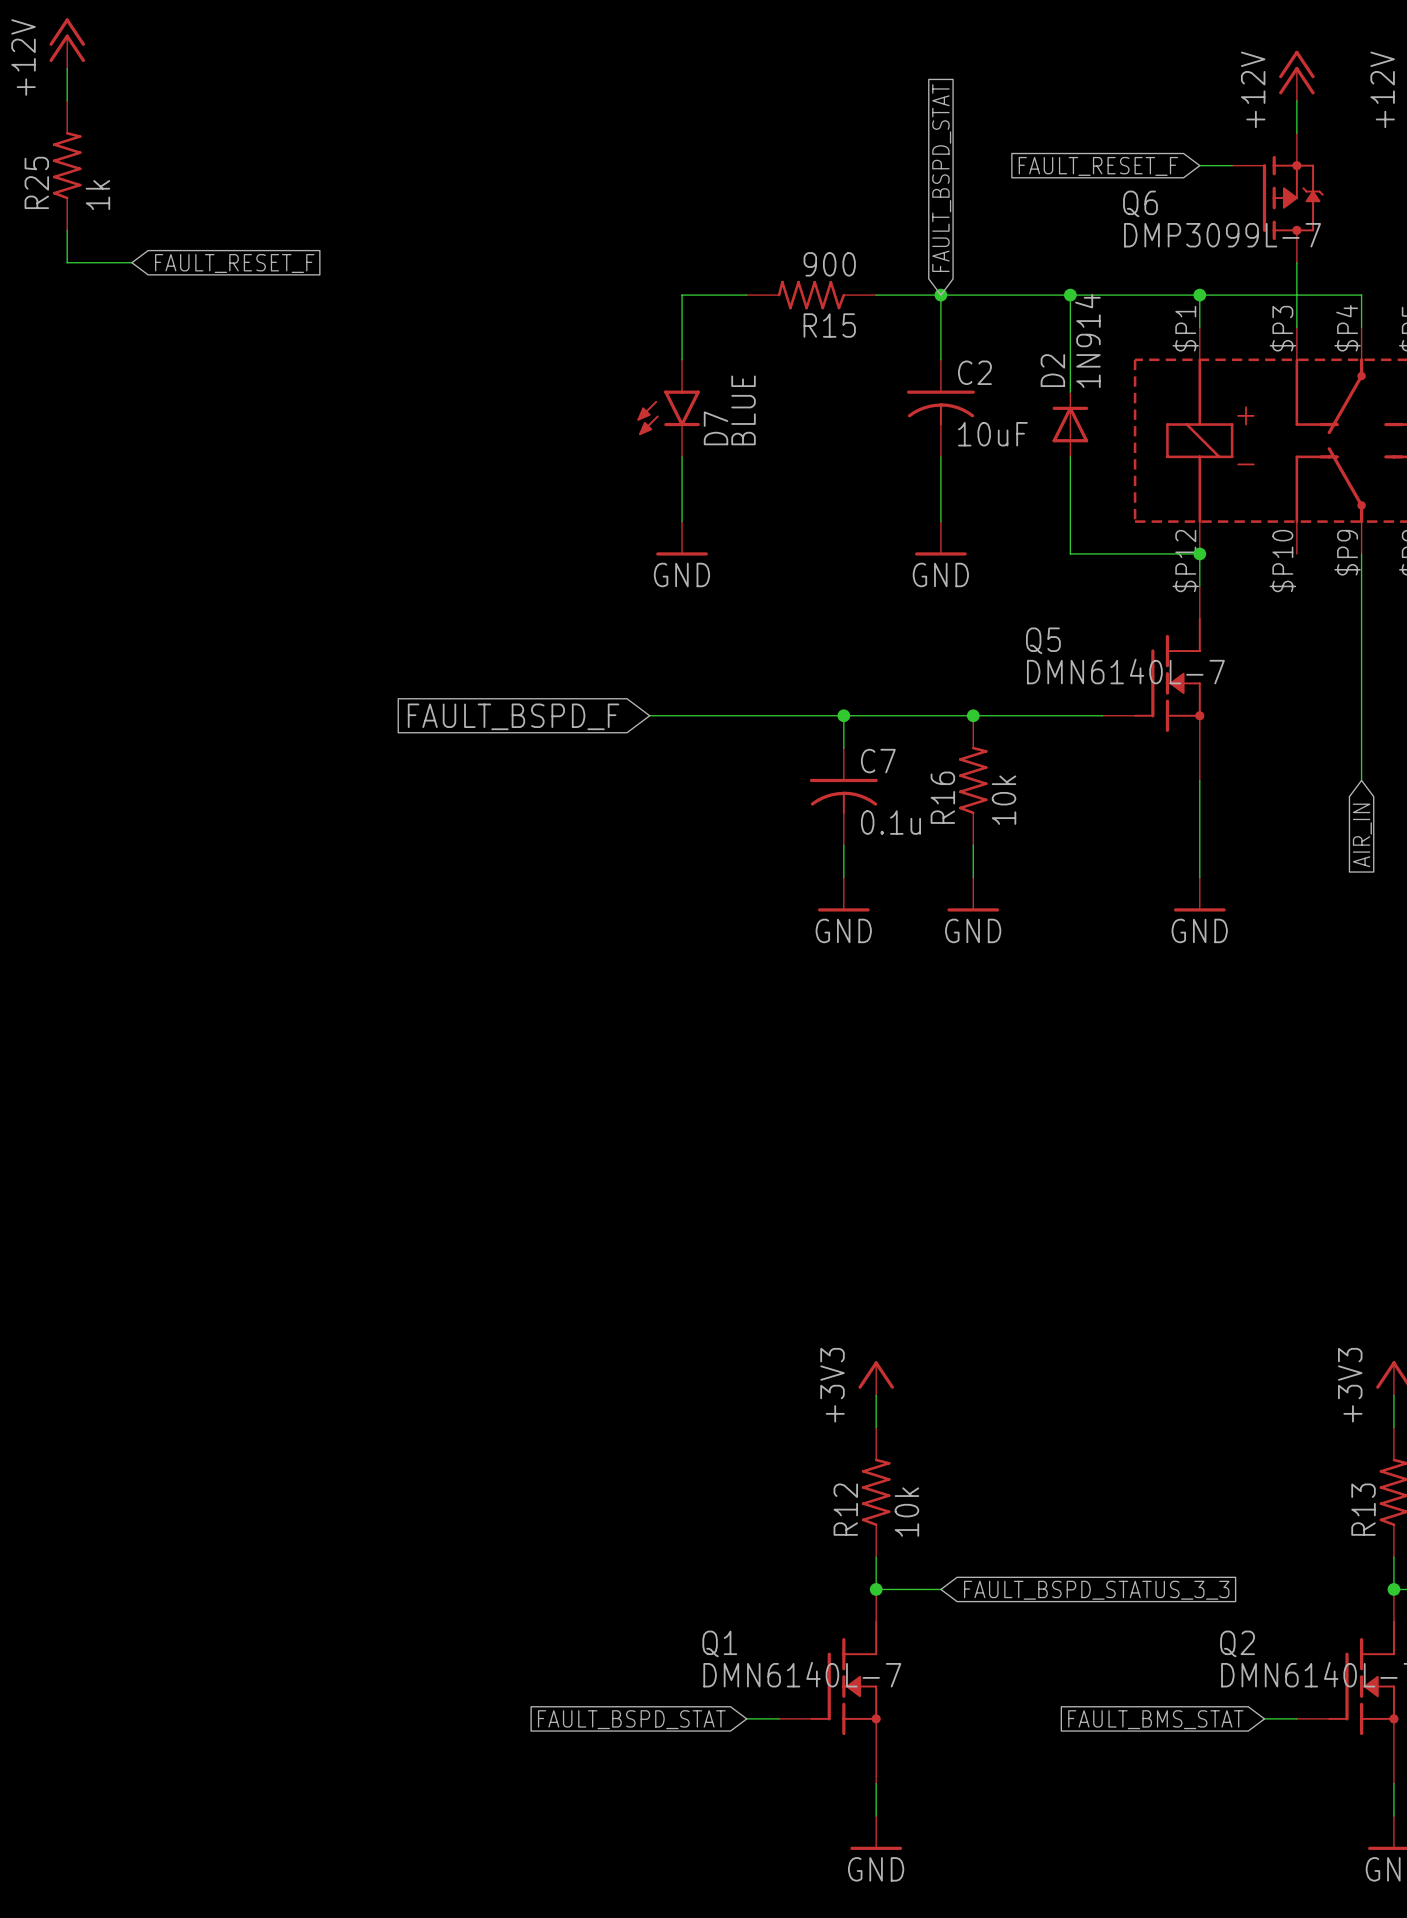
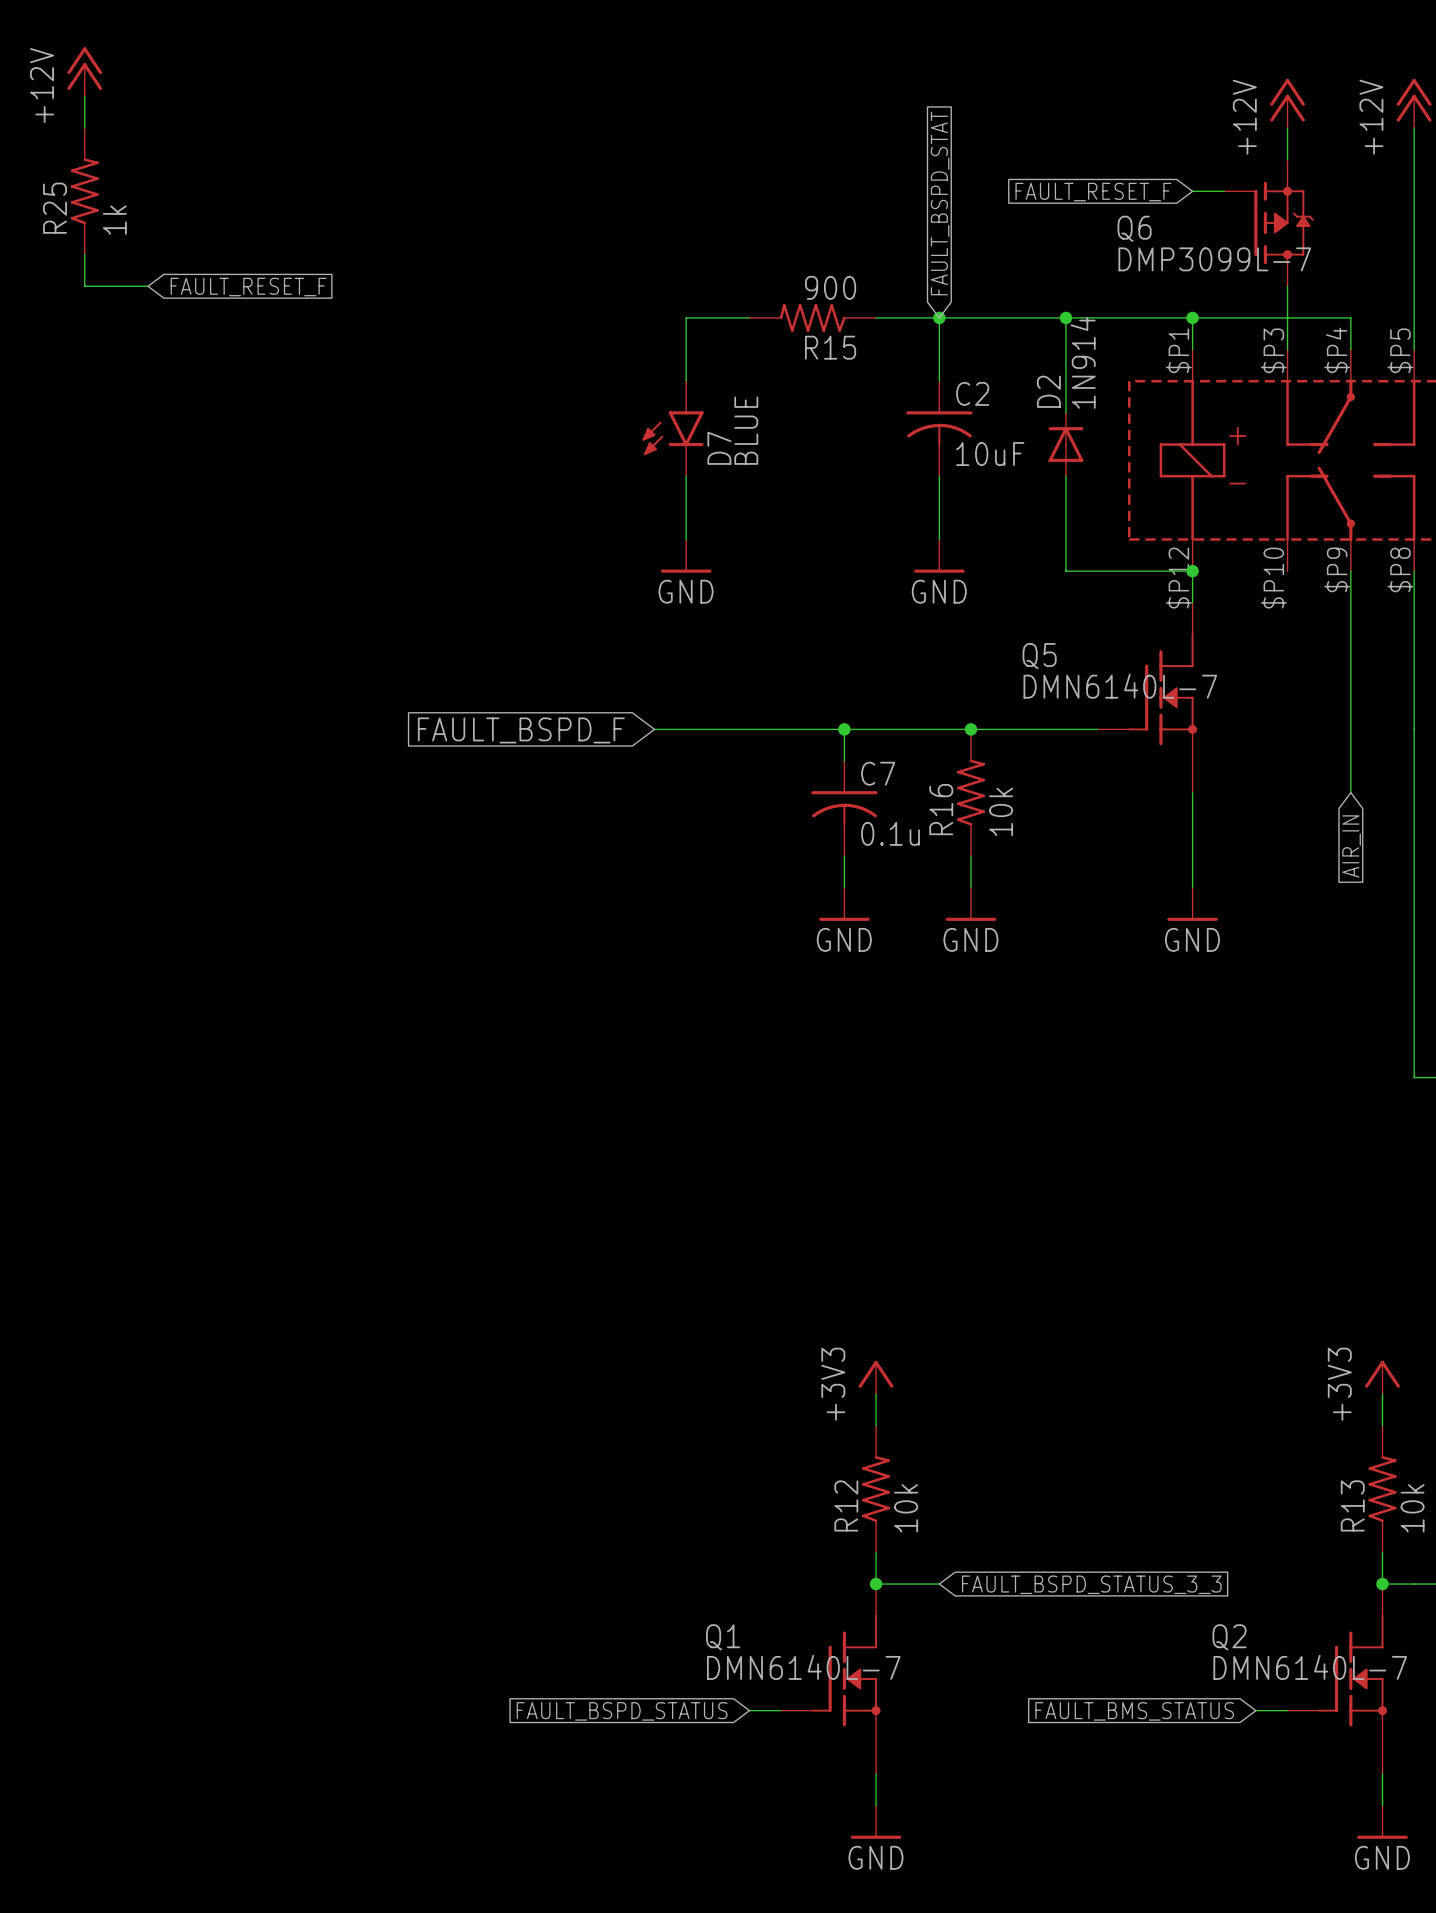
global label: FAULT_BSPD_STAT (631, 1719) -> FAULT_BSPD_STATUS (622, 1711)
global label: FAULT_BMS_STAT (1155, 1719) -> FAULT_BMS_STATUS (1134, 1711)

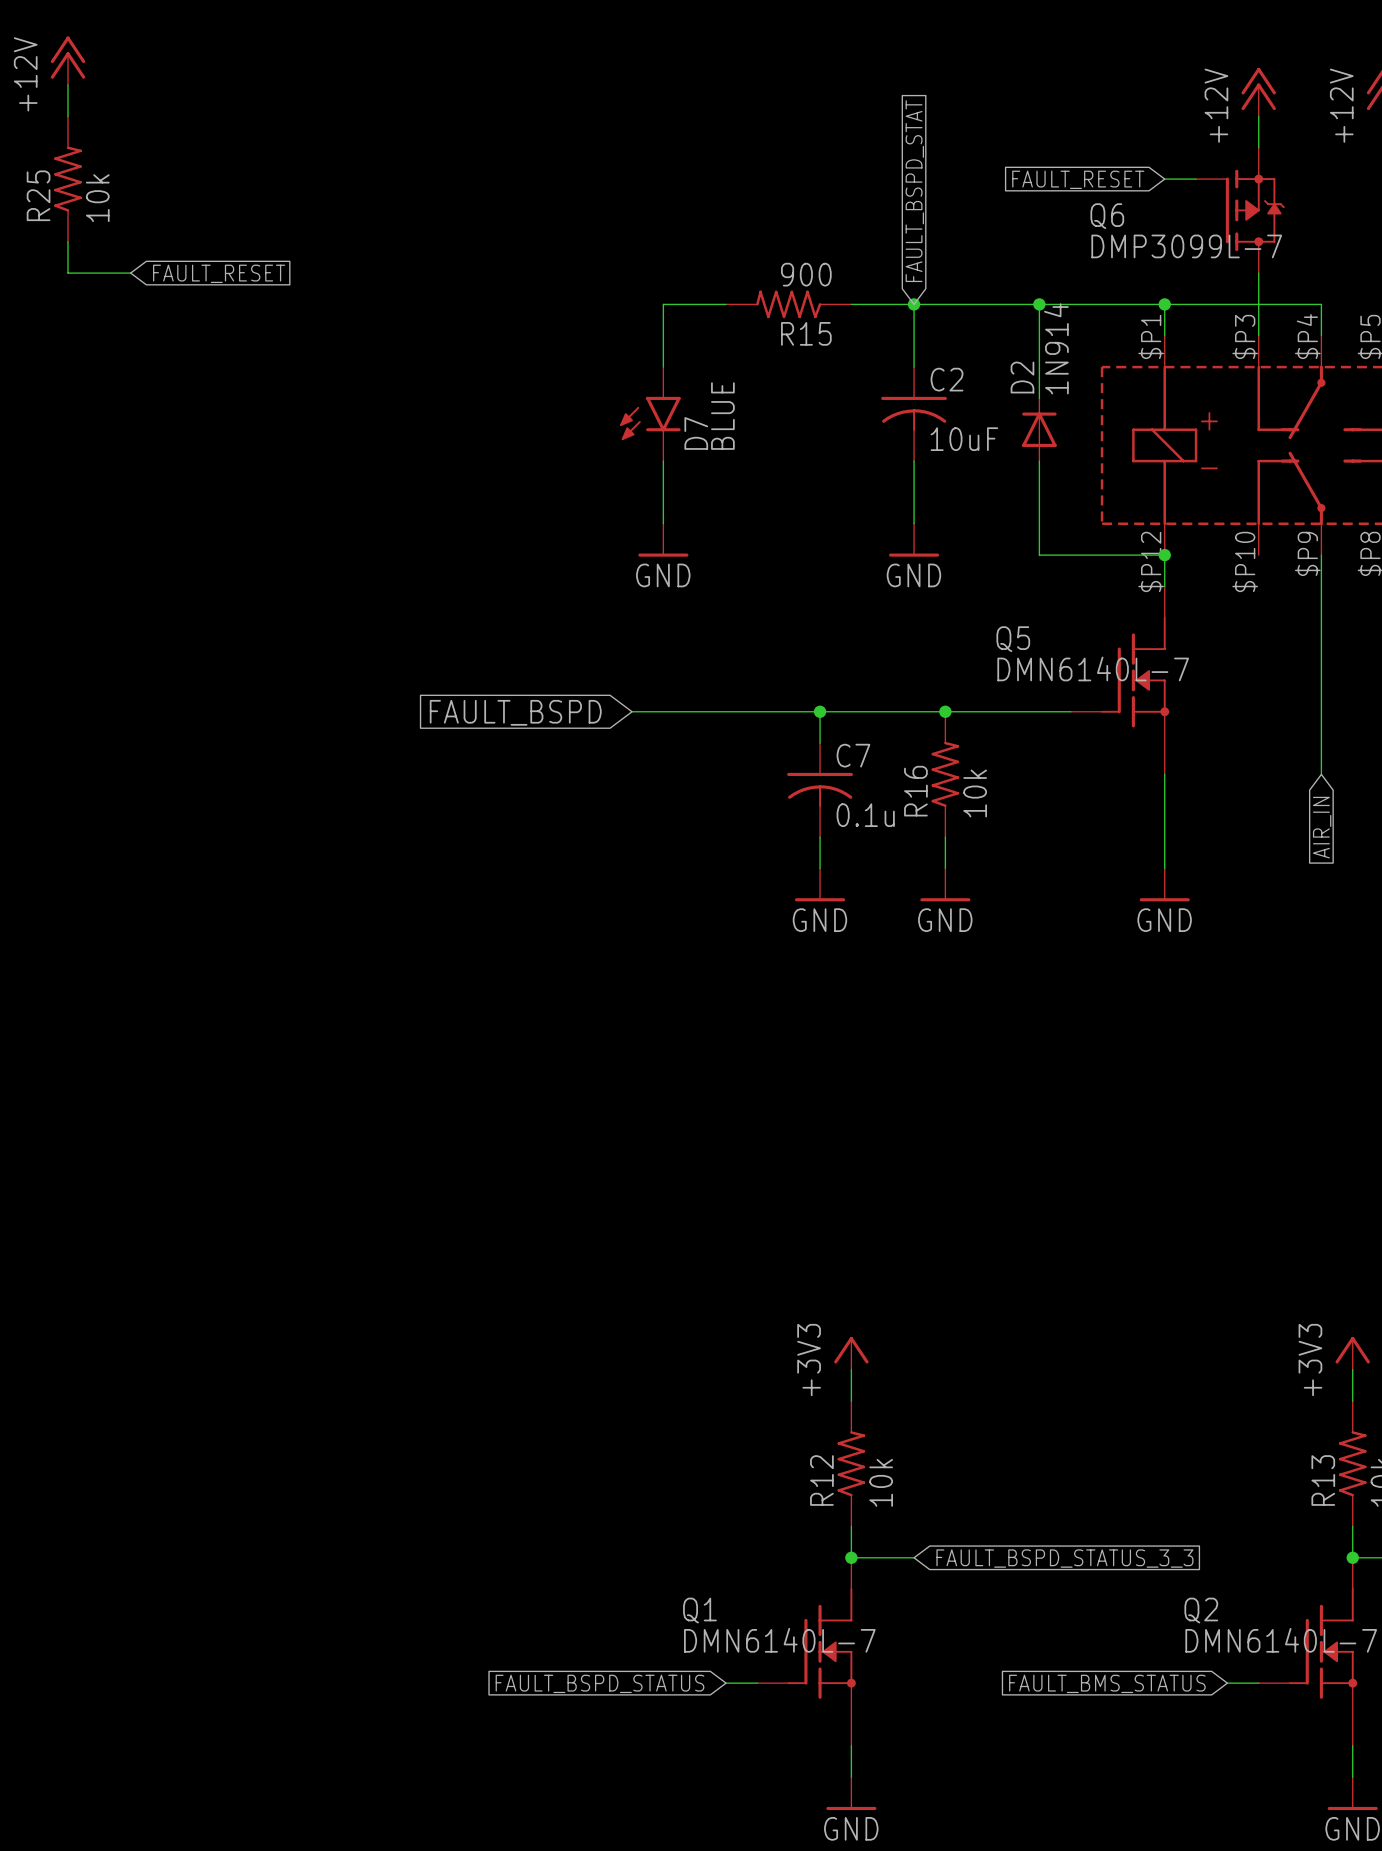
global label: FAULT_RESET_F (1093, 192) -> FAULT_RESET (1078, 179)
R25 value: 1k (114, 220) -> 10k (97, 198)
global label: FAULT_RESET_F (248, 287) -> FAULT_RESET (219, 273)
global label: FAULT_BSPD_F (521, 730) -> FAULT_BSPD (515, 712)

